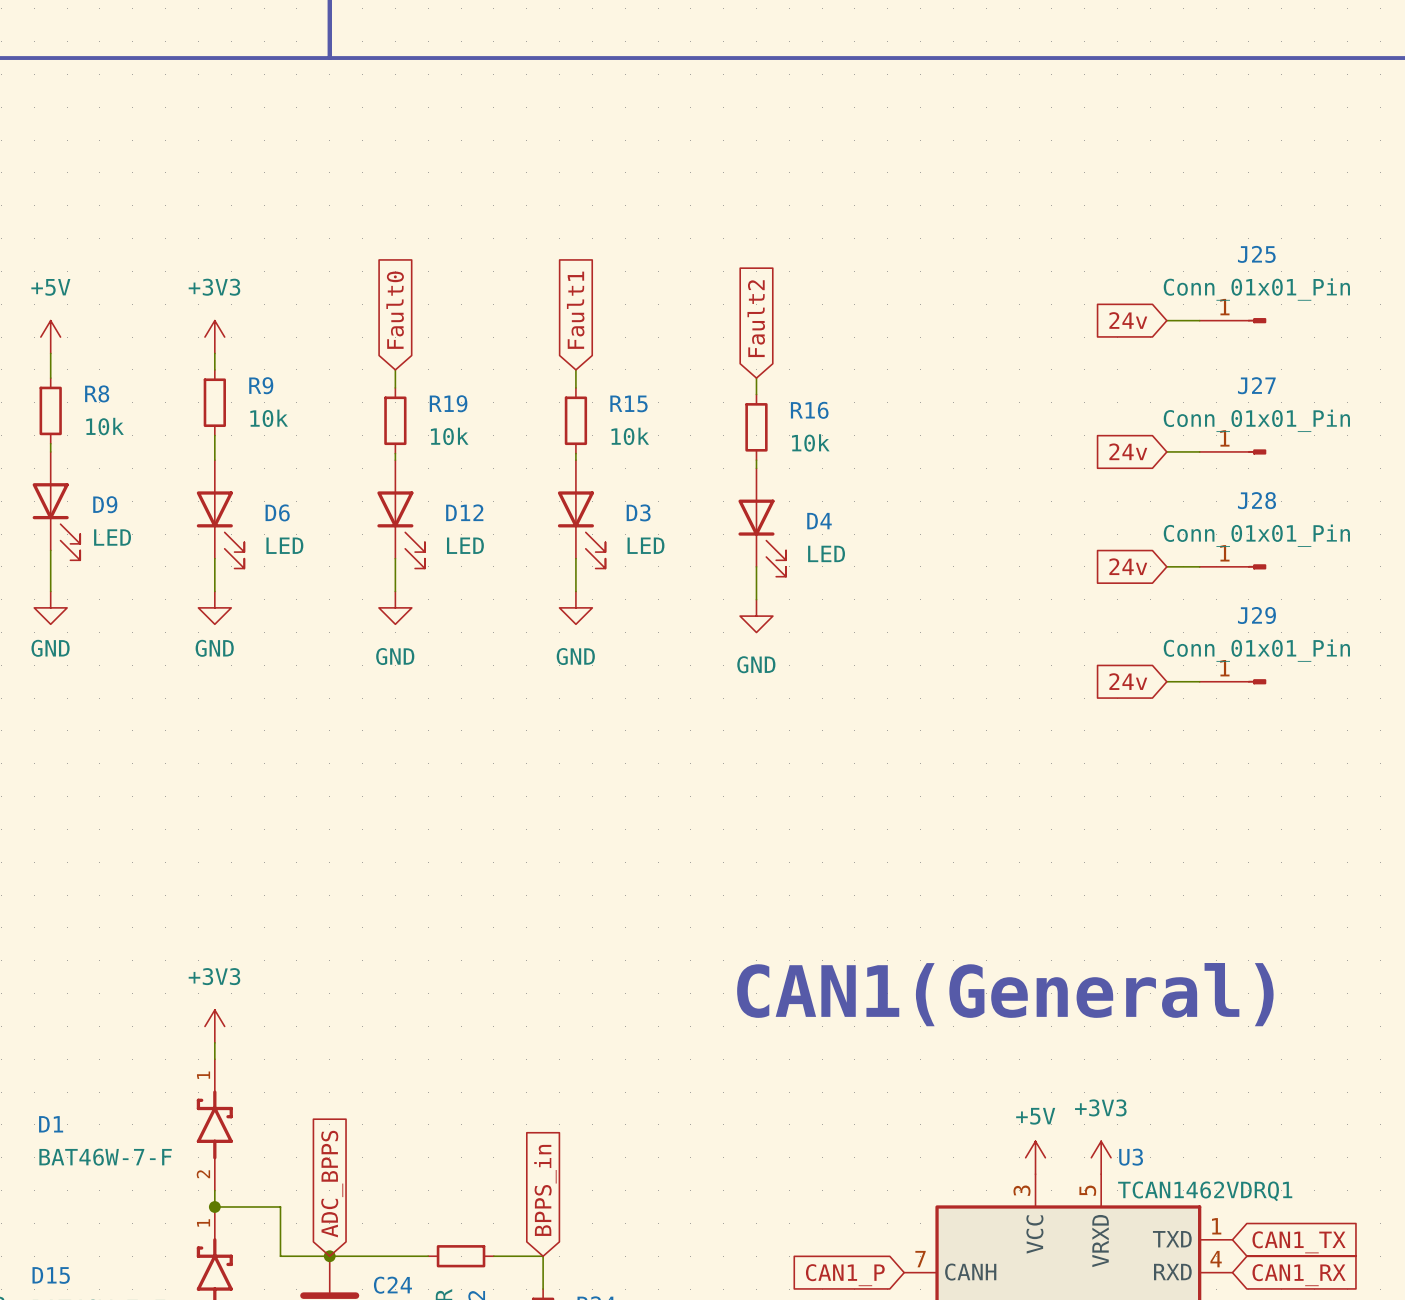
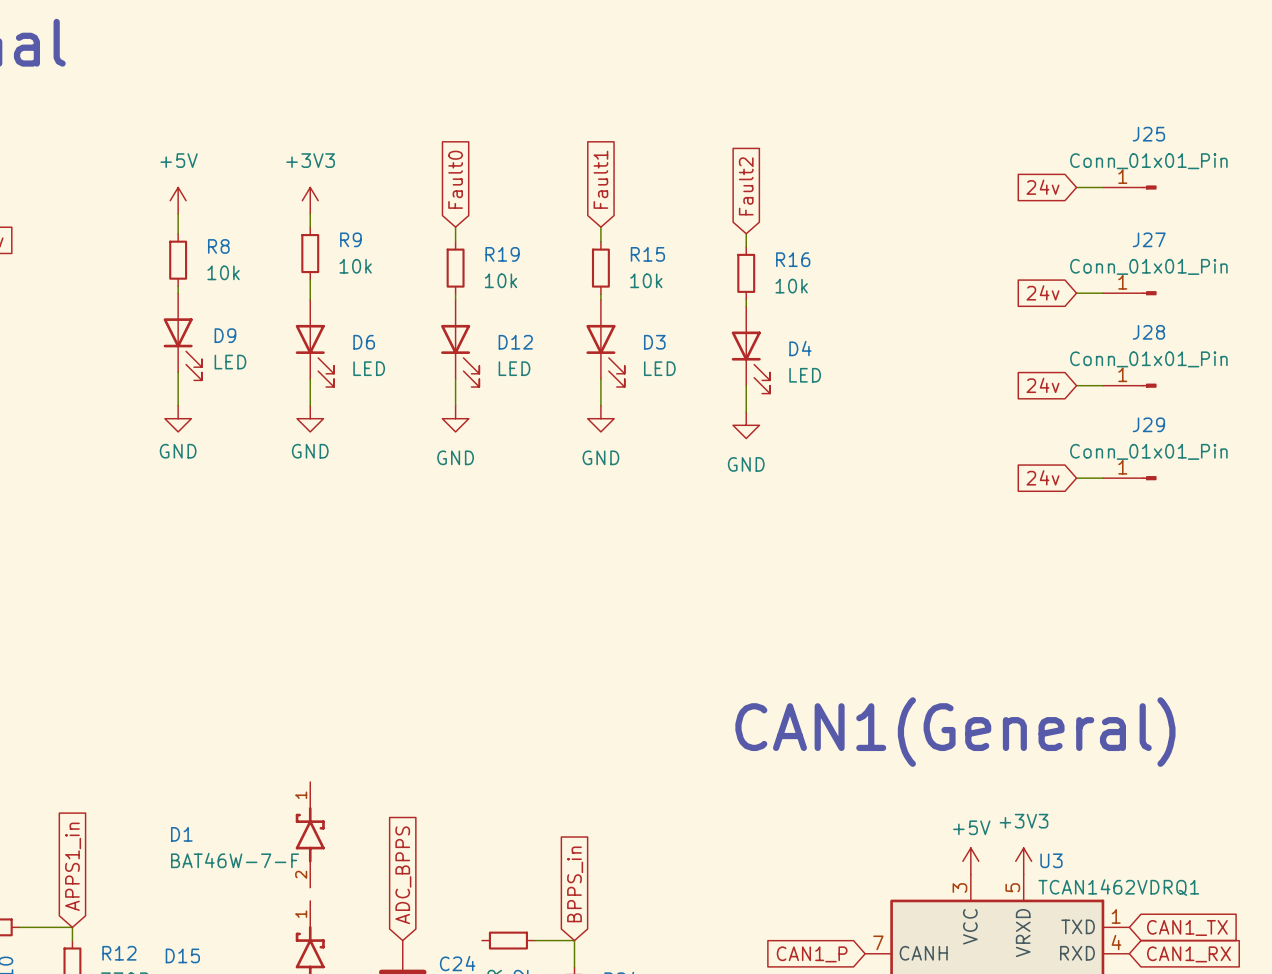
power symbol: +3V3 (214, 1026) -> none
wire: (214, 1042) (214, 1059) -> none
wire: (214, 1190) (214, 1206) (280, 1206) (280, 1256) (428, 1256) -> none
junction: (214, 1206) -> none
junction: (329, 1256) -> none

